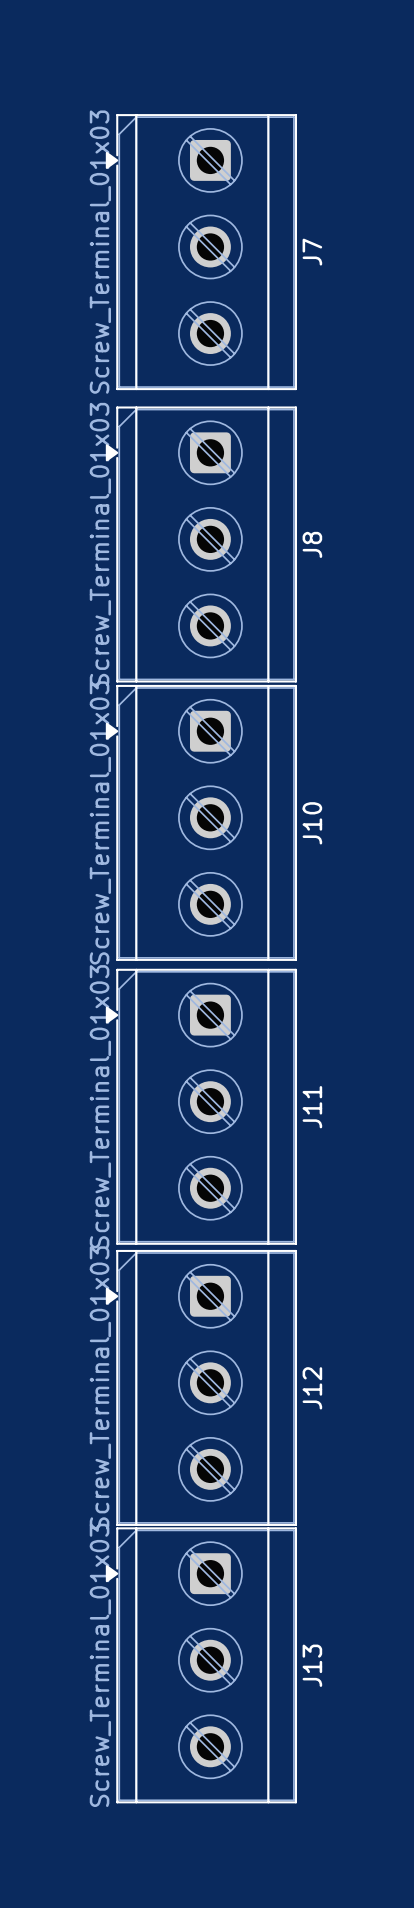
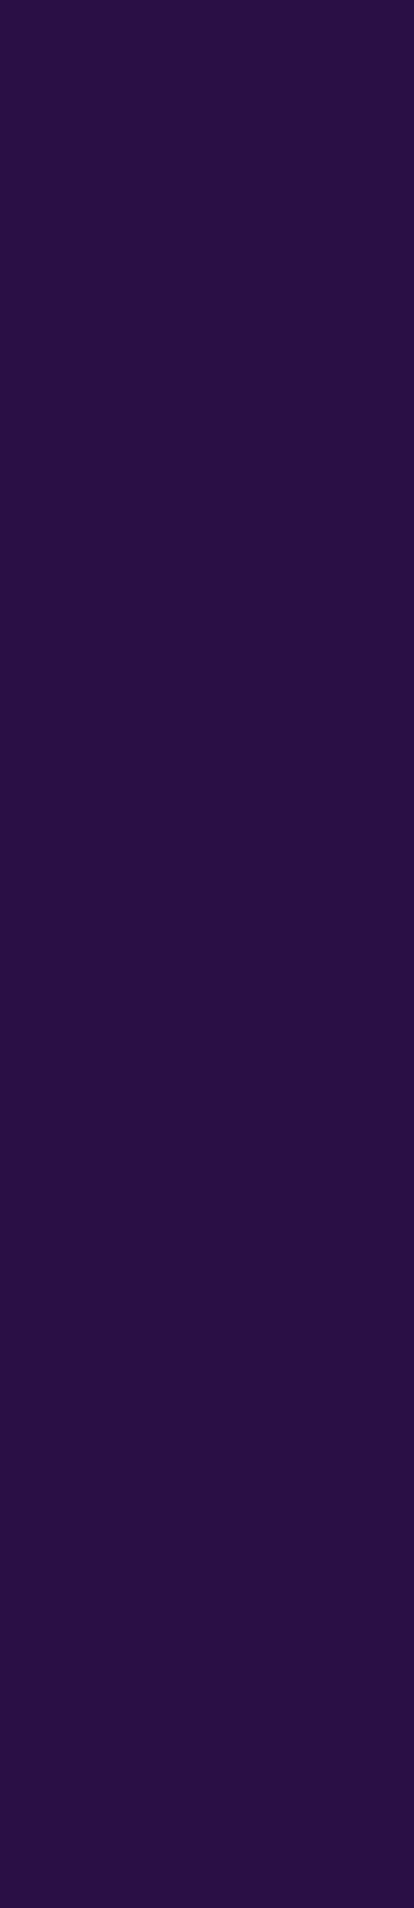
J7: Screw_Terminal_01x03 (201, 252) -> none
J8: Screw_Terminal_01x03 (201, 544) -> none
J10: Screw_Terminal_01x03 (201, 822) -> none
J11: Screw_Terminal_01x03 (201, 1106) -> none
J12: Screw_Terminal_01x03 (201, 1387) -> none
J13: Screw_Terminal_01x03 (201, 1665) -> none

